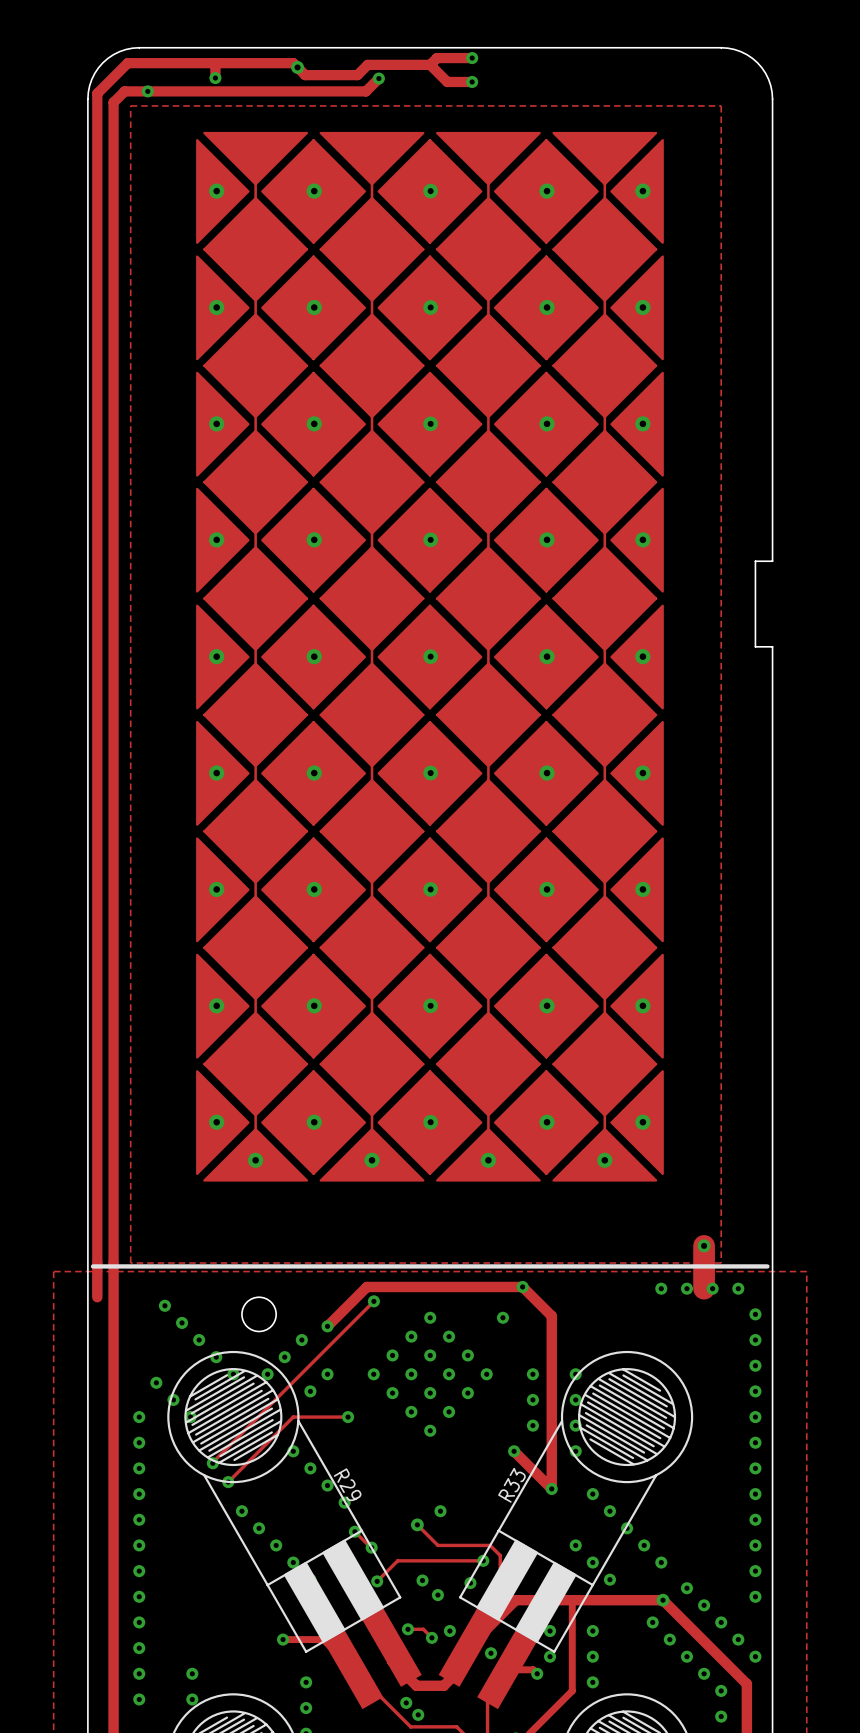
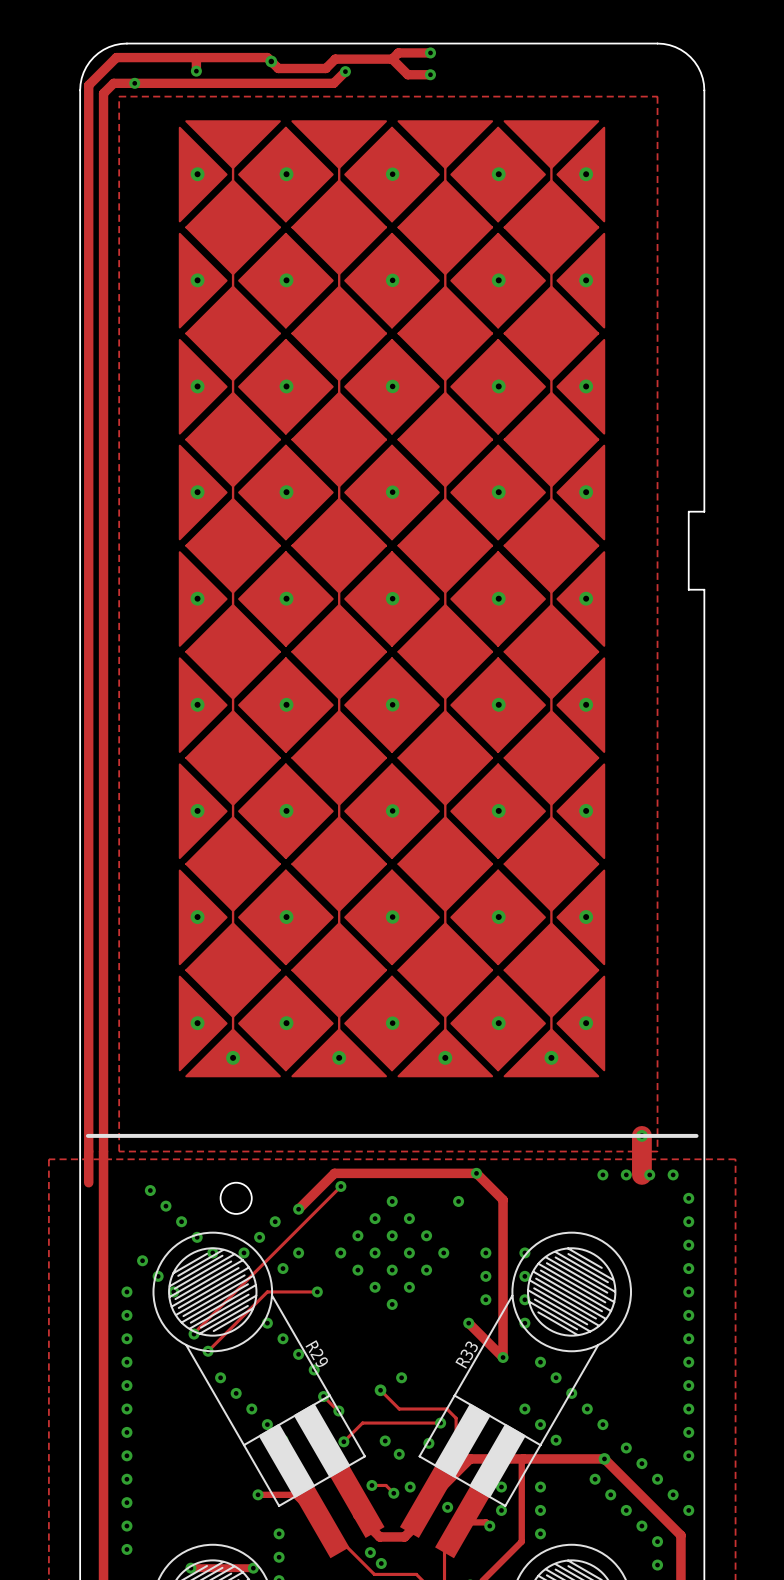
line: none -> (87, 1135) (696, 1135)
line: (93, 1266) (767, 1266) -> none
via: (192, 1673) -> none
via: (192, 1699) -> none
track: none -> (190, 1568) (253, 1568)
via: none -> (190, 1568)
via: none -> (253, 1568)

